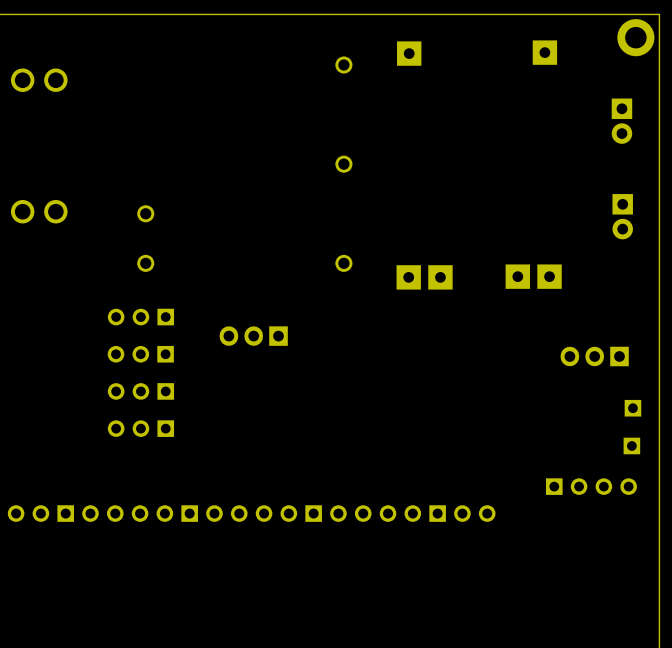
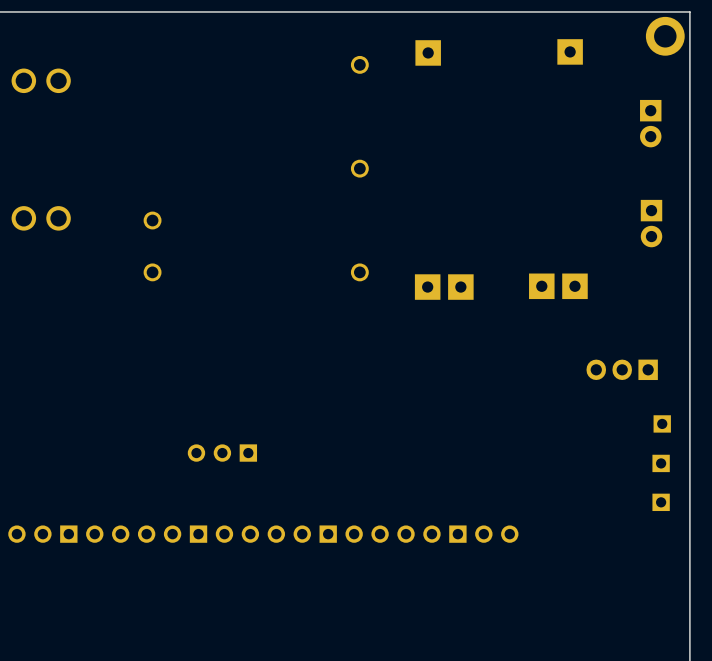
part: (140, 317) -> none
part: (253, 336) -> none
part: (140, 354) -> none
part: (140, 391) -> none
part: (140, 428) -> none
part: none -> (222, 453)
part: none -> (661, 502)
part: (591, 486) -> none

